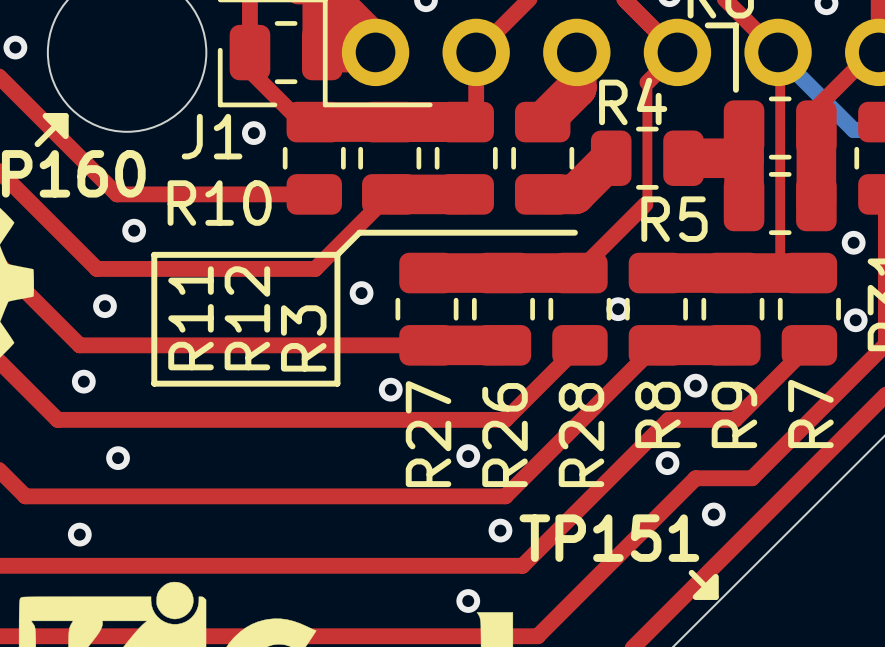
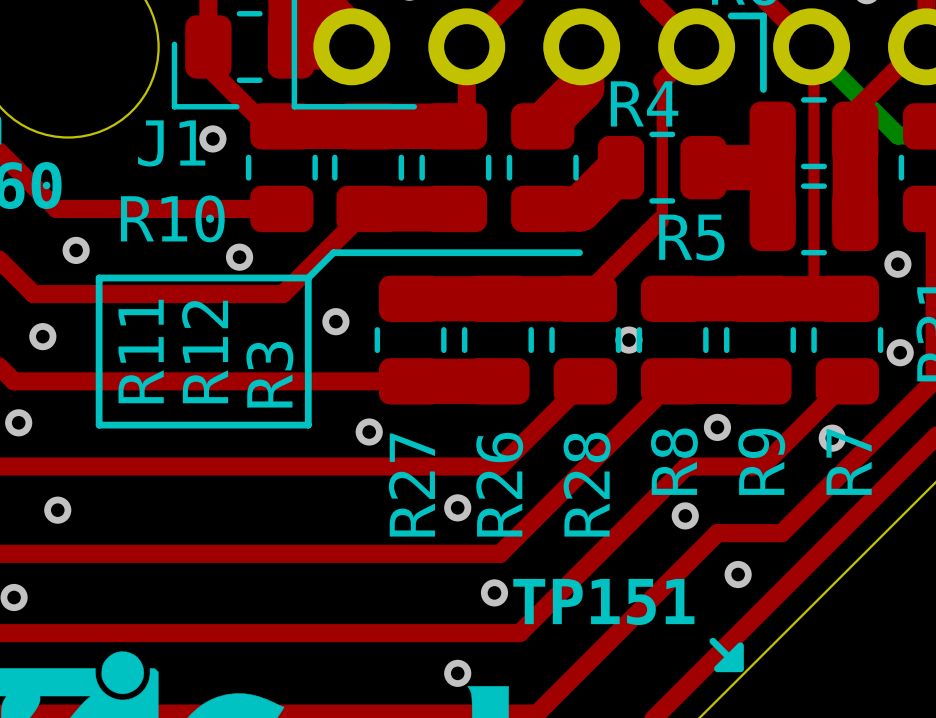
via: none -> (239, 257)
via: none -> (832, 438)

